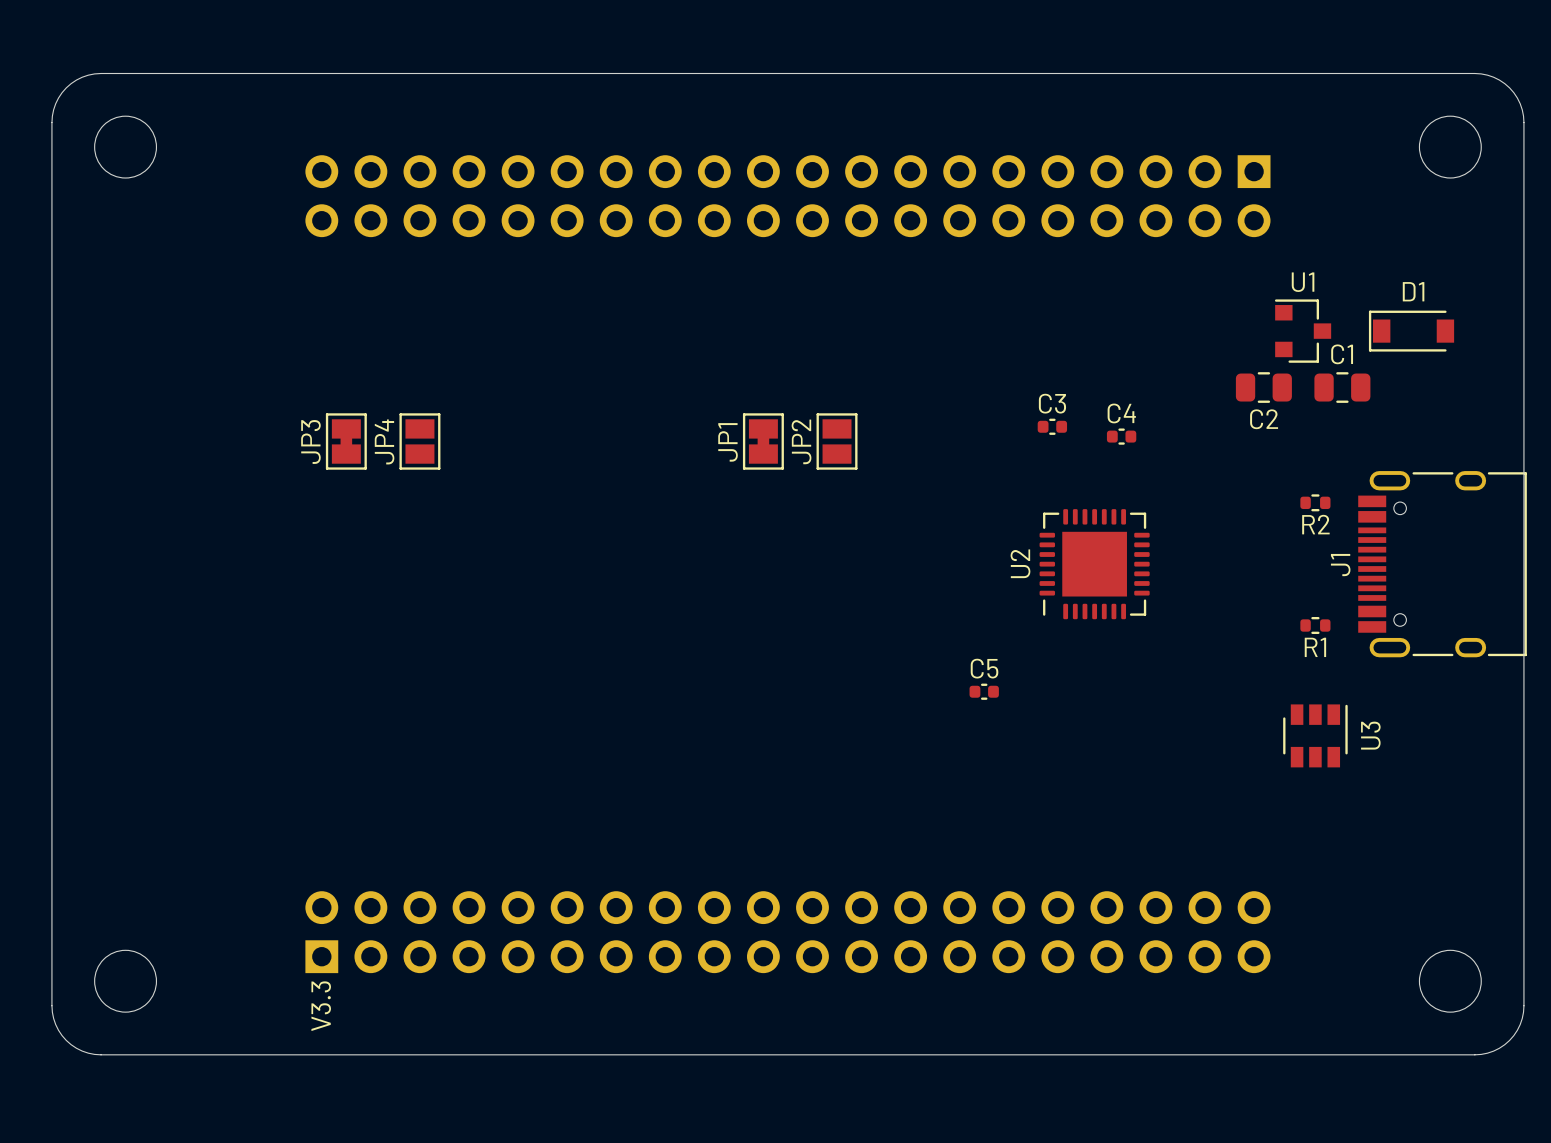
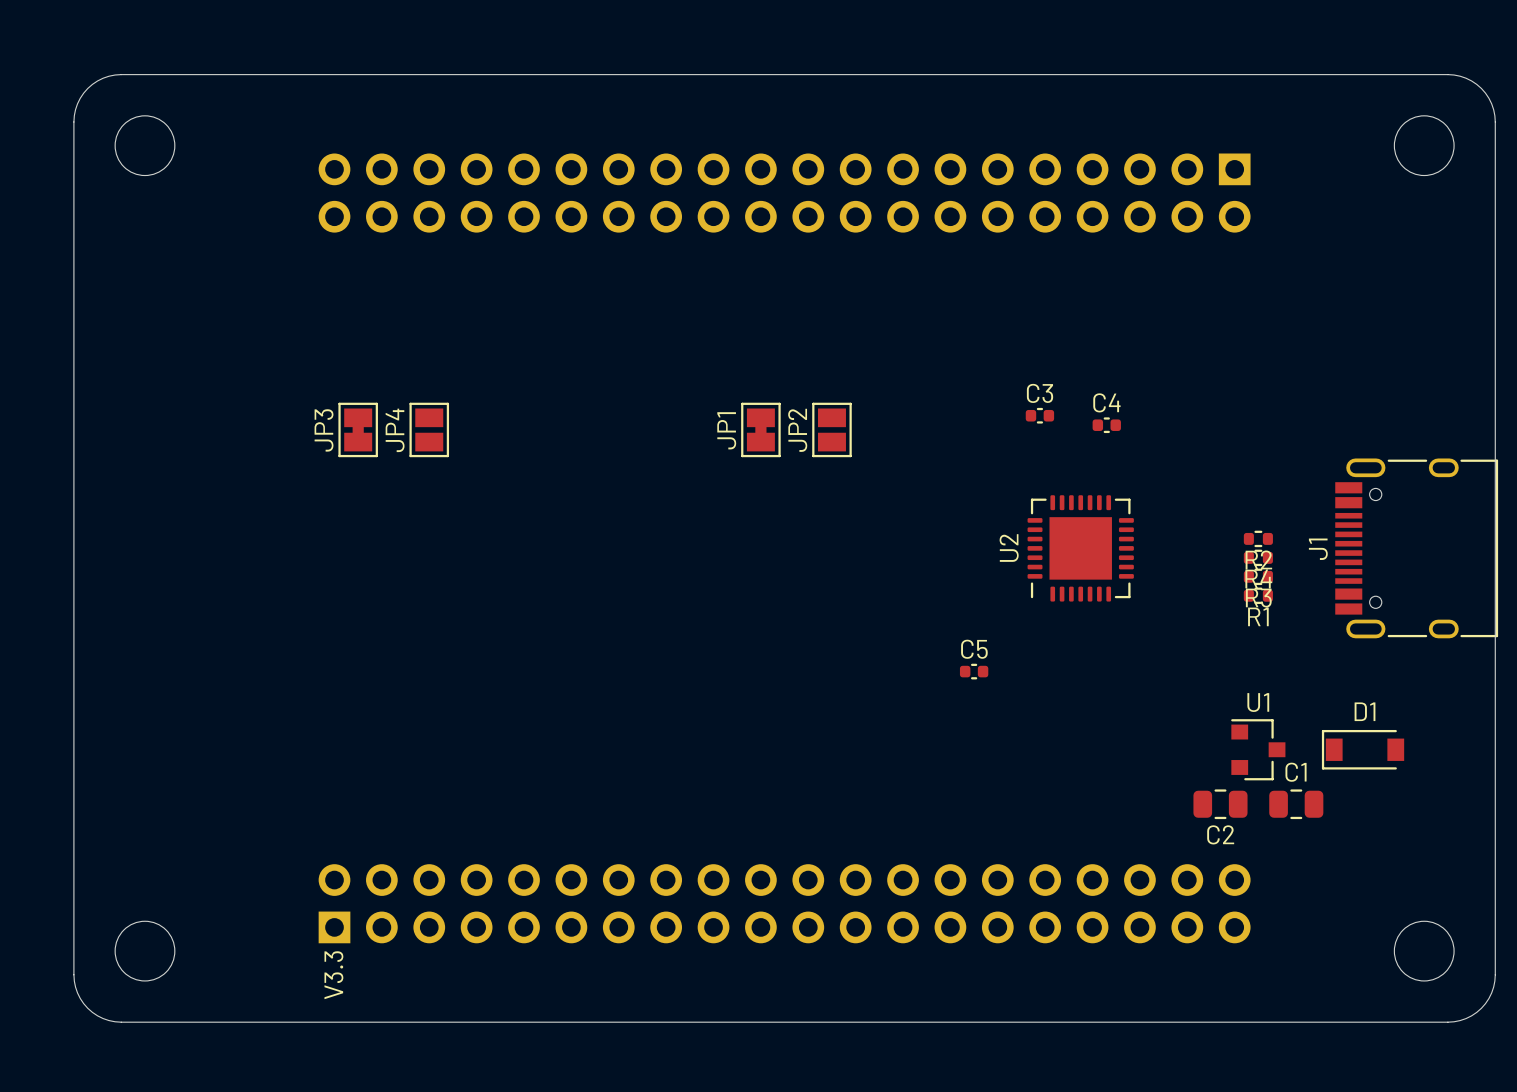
U1 position: (1303, 331) -> (1258, 749)
D1 position: (1411, 331) -> (1363, 749)
C2 position: (1263, 387) -> (1220, 804)
C1 position: (1342, 387) -> (1296, 804)
R2 position: (1315, 502) -> (1258, 538)
R4: none -> (1258, 557)
R3: none -> (1258, 576)
R1 position: (1315, 625) -> (1258, 595)
U3: (1315, 735) -> none

